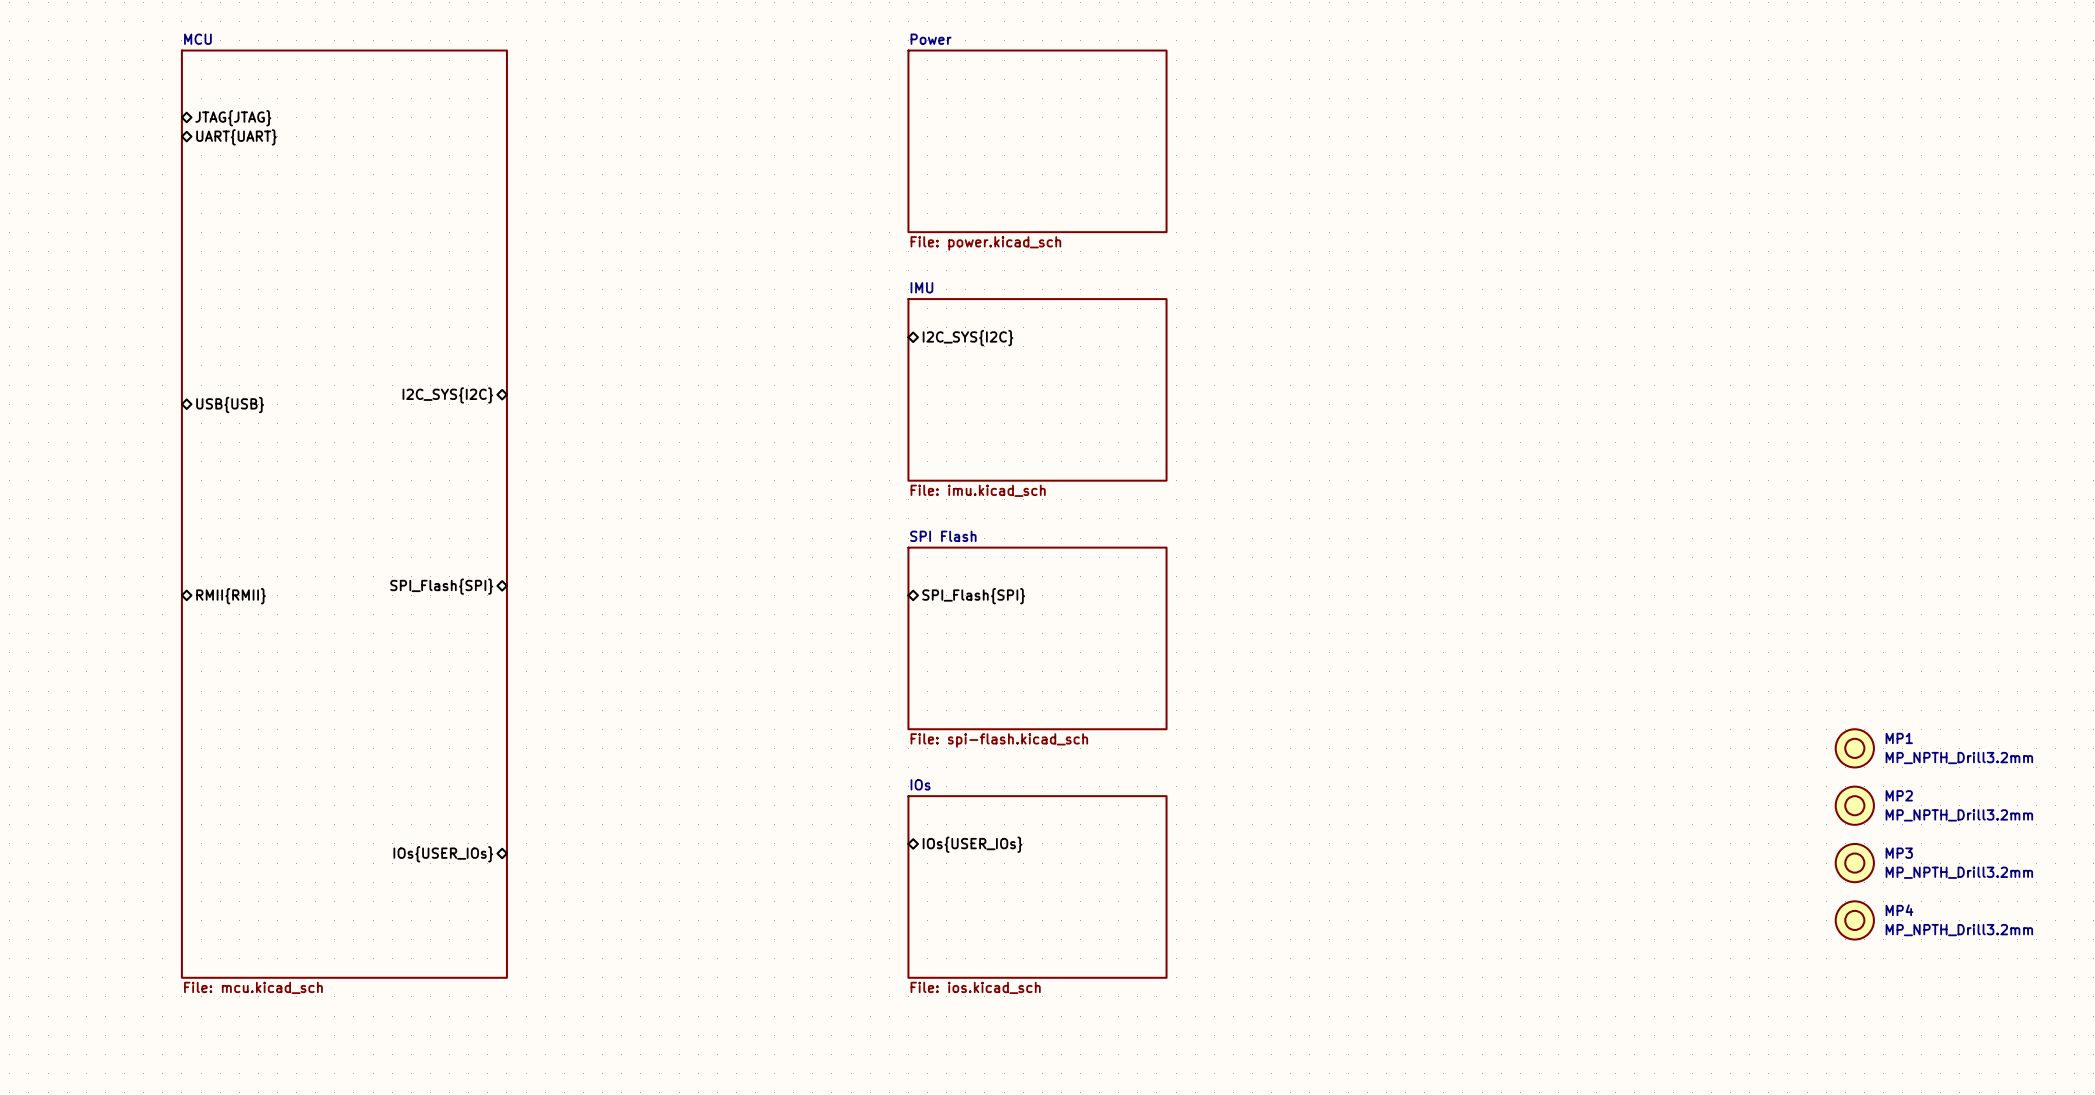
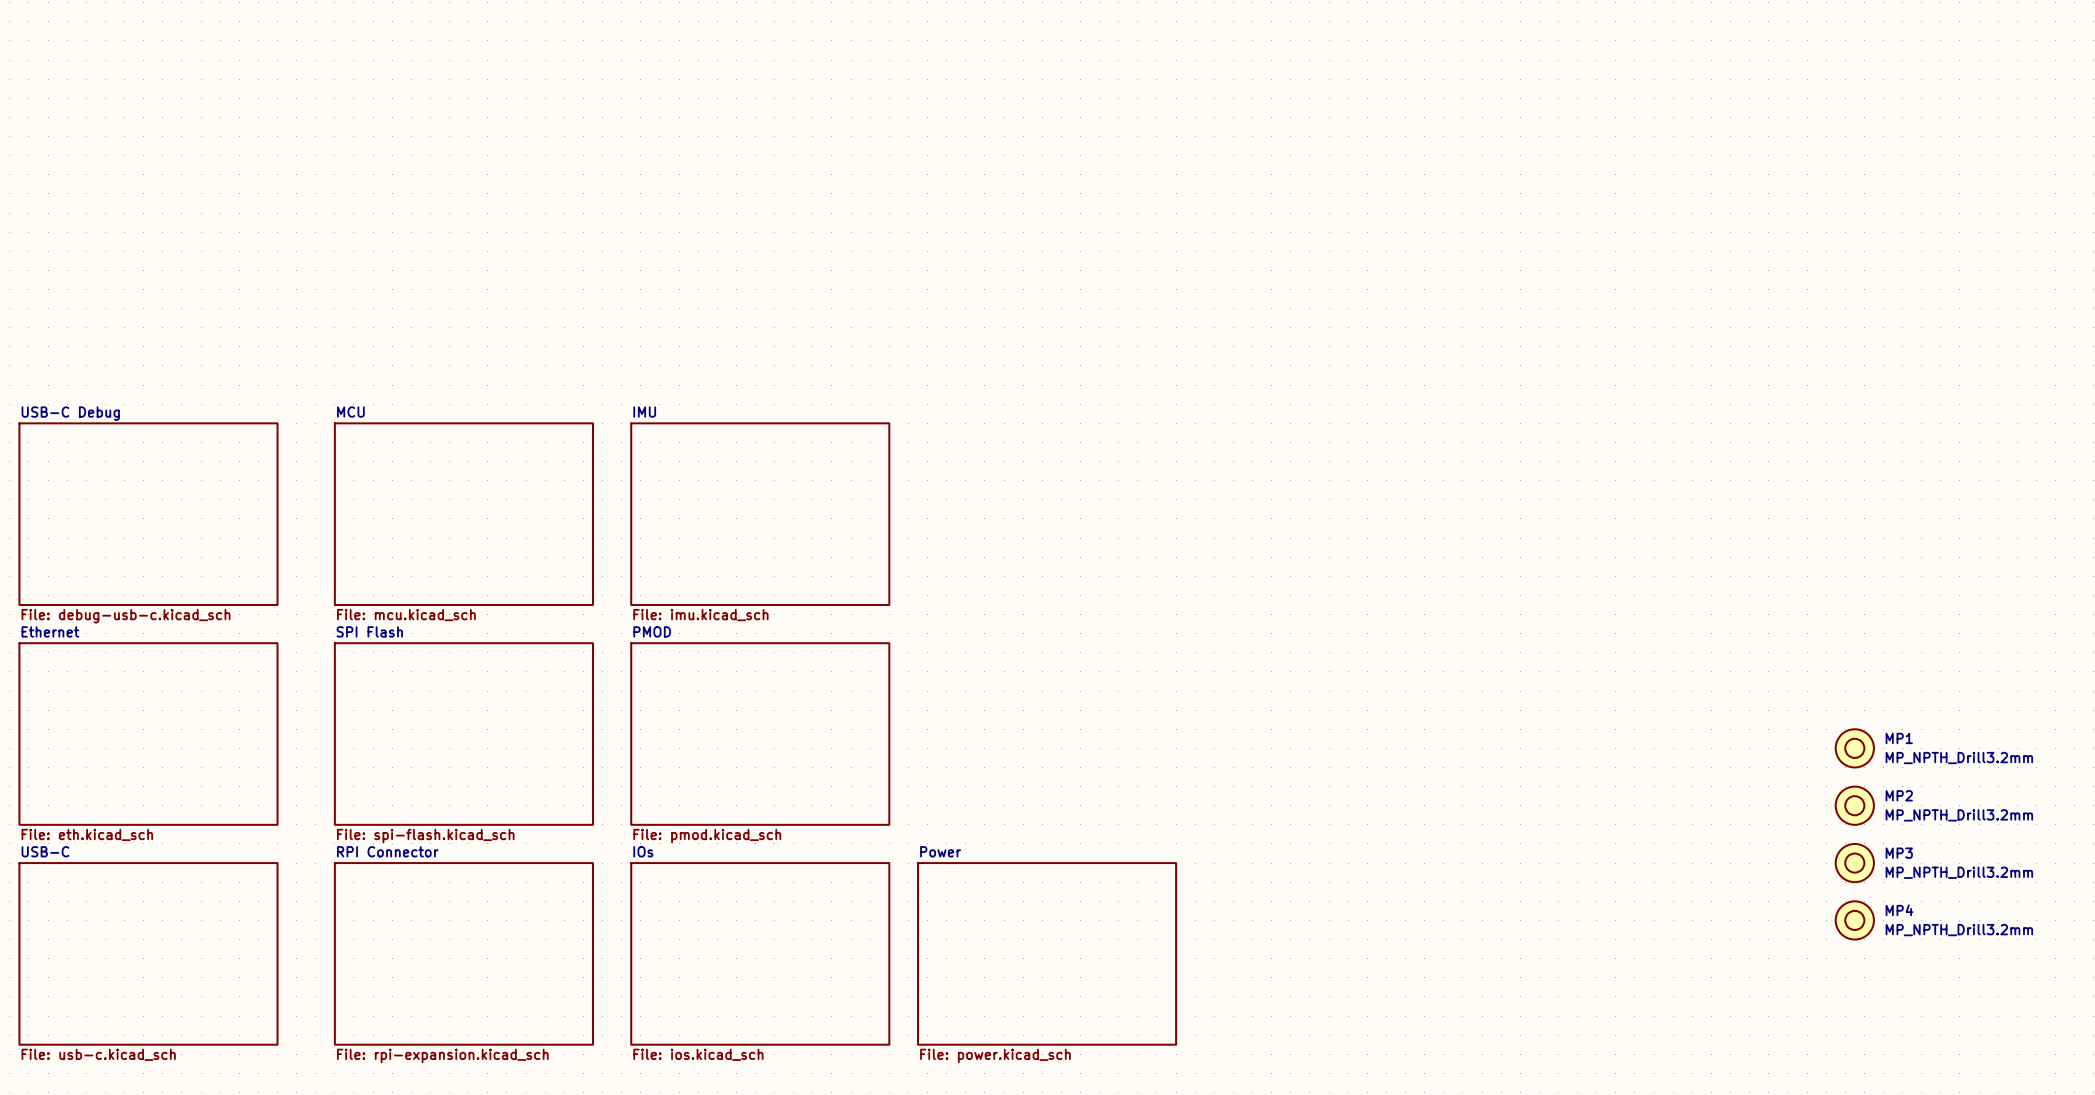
sheet pin: JTAG{JTAG} (233, 118) -> none
sheet pin: UART{UART} (236, 137) -> none
sheet Power: File: power.kicad_sch (1037, 141) -> none
sheet pin: I2C_SYS{I2C} (967, 338) -> none
sheet IMU: File: imu.kicad_sch (1037, 389) -> none
sheet pin: I2C_SYS{I2C} (447, 395) -> none
sheet pin: USB{USB} (230, 405) -> none
sheet USB-C Debug: none -> File: debug-usb-c.kicad_sch (148, 514)
sheet MCU: File: mcu.kicad_sch (344, 514) -> none
sheet MCU: none -> File: mcu.kicad_sch (463, 514)
sheet IMU: none -> File: imu.kicad_sch (760, 514)
sheet pin: SPI_Flash{SPI} (441, 586) -> none
sheet pin: RMII{RMII} (231, 596) -> none
sheet pin: SPI_Flash{SPI} (973, 596) -> none
sheet SPI Flash: File: spi-flash.kicad_sch (1037, 638) -> none
sheet Ethernet: none -> File: eth.kicad_sch (148, 734)
sheet SPI Flash: none -> File: spi-flash.kicad_sch (463, 734)
sheet PMOD: none -> File: pmod.kicad_sch (760, 734)
sheet pin: IOs{USER_IOs} (972, 844) -> none
sheet pin: IOs{USER_IOs} (443, 854) -> none
sheet IOs: File: ios.kicad_sch (1037, 886) -> none
sheet USB-C: none -> File: usb-c.kicad_sch (148, 953)
sheet RPI Connector: none -> File: rpi-expansion.kicad_sch (463, 953)
sheet IOs: none -> File: ios.kicad_sch (760, 953)
sheet Power: none -> File: power.kicad_sch (1047, 953)

